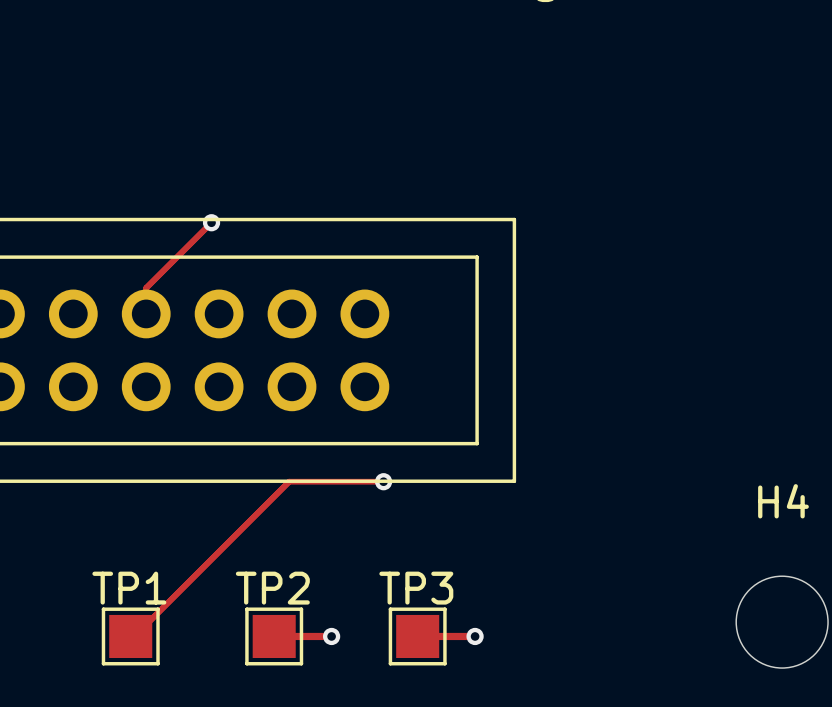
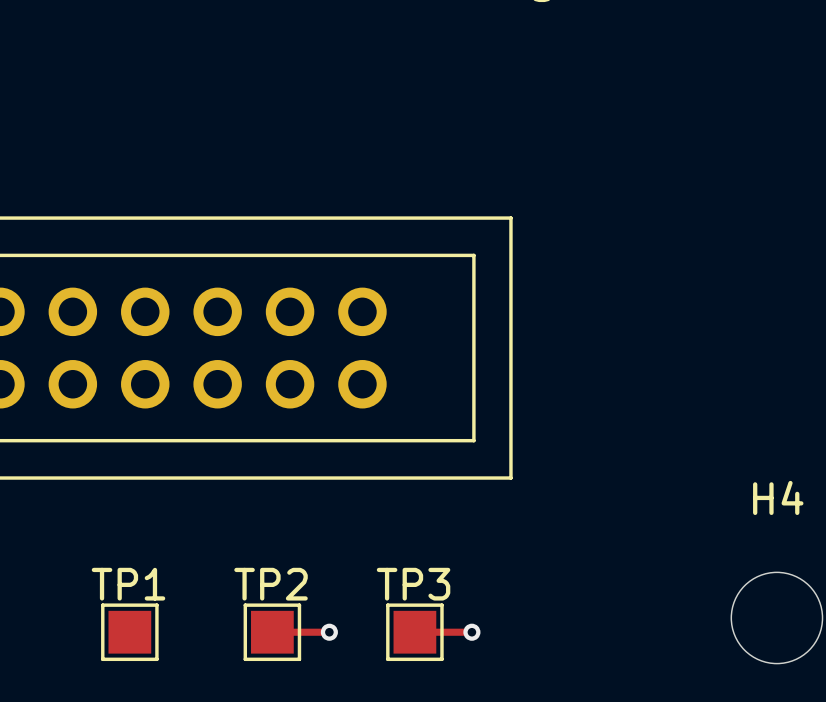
top track: (211, 222) (146, 288) (146, 313) -> none
via: (211, 222) -> none
top track: (383, 481) (289, 481) (134, 636) (130, 636) -> none
via: (383, 481) -> none

